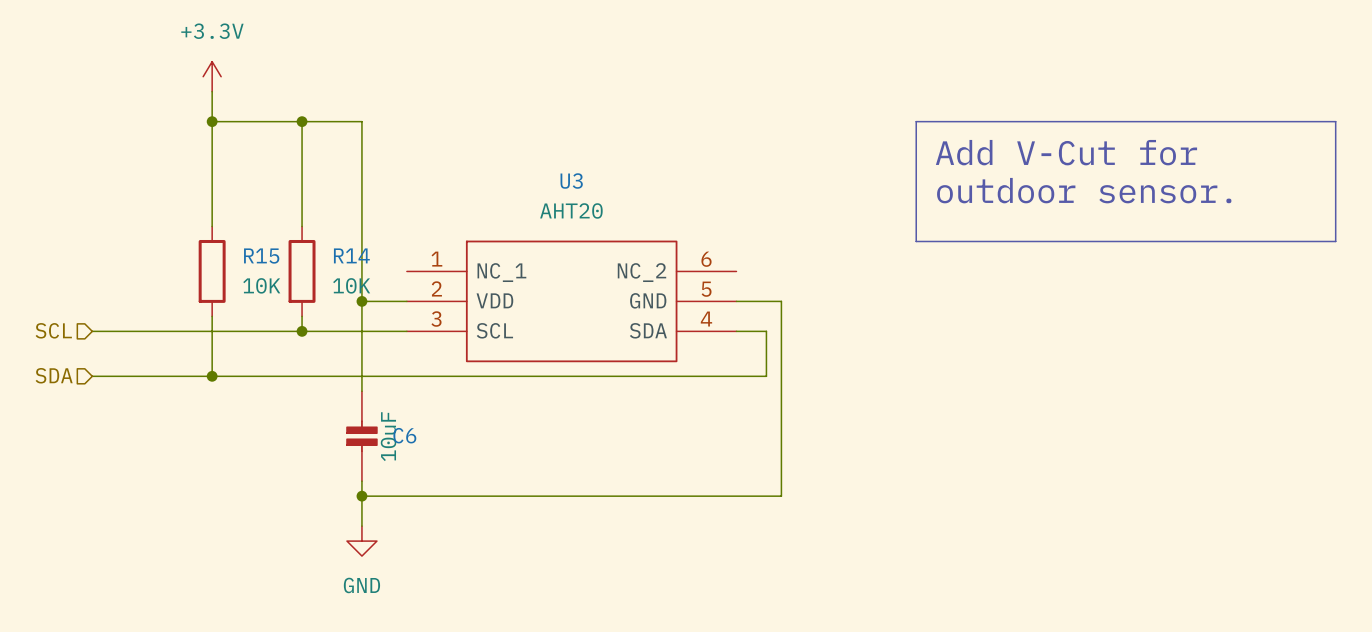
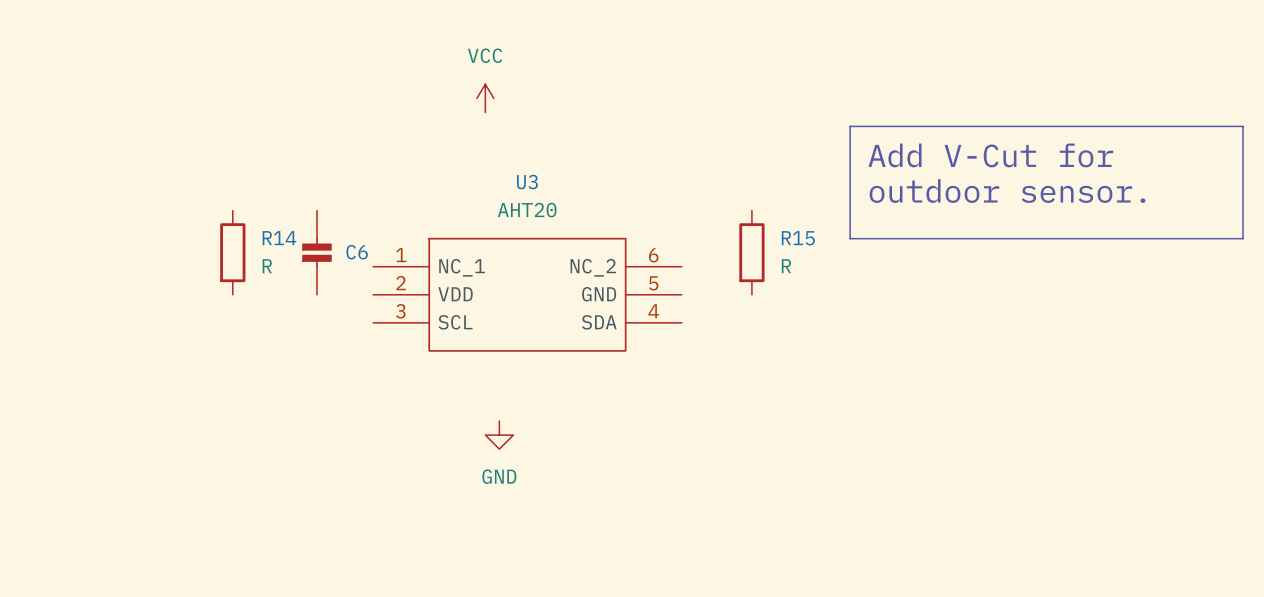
power symbol: +3.3V (212, 76) -> none
wire: (212, 91) (212, 226) -> none
power symbol: none -> VCC (485, 98)
wire: (212, 121) (361, 121) (361, 391) -> none
junction: (212, 121) -> none
wire: (302, 121) (302, 226) -> none
junction: (302, 121) -> none
R15 position: (212, 271) -> (751, 252)
R14 position: (302, 271) -> (232, 252)
R15 value: 10K (261, 285) -> R (786, 266)
R14 value: 10K (351, 285) -> R (267, 266)
wire: (361, 301) (406, 301) -> none
junction: (361, 301) -> none
wire: (736, 301) (781, 301) (781, 496) (361, 496) -> none
wire: (212, 316) (212, 376) -> none
wire: (302, 316) (302, 331) -> none
hierarchical label: SCL (53, 330) -> none
wire: (92, 331) (406, 331) -> none
junction: (302, 331) -> none
wire: (736, 331) (766, 331) (766, 376) (92, 376) -> none
hierarchical label: SDA (54, 375) -> none
junction: (212, 376) -> none
C6 position: (361, 436) -> (316, 252)
C6 value: 10uF (388, 436) -> none
wire: (361, 481) (361, 526) -> none
junction: (361, 496) -> none
power symbol position: GND (361, 541) -> GND (499, 435)

